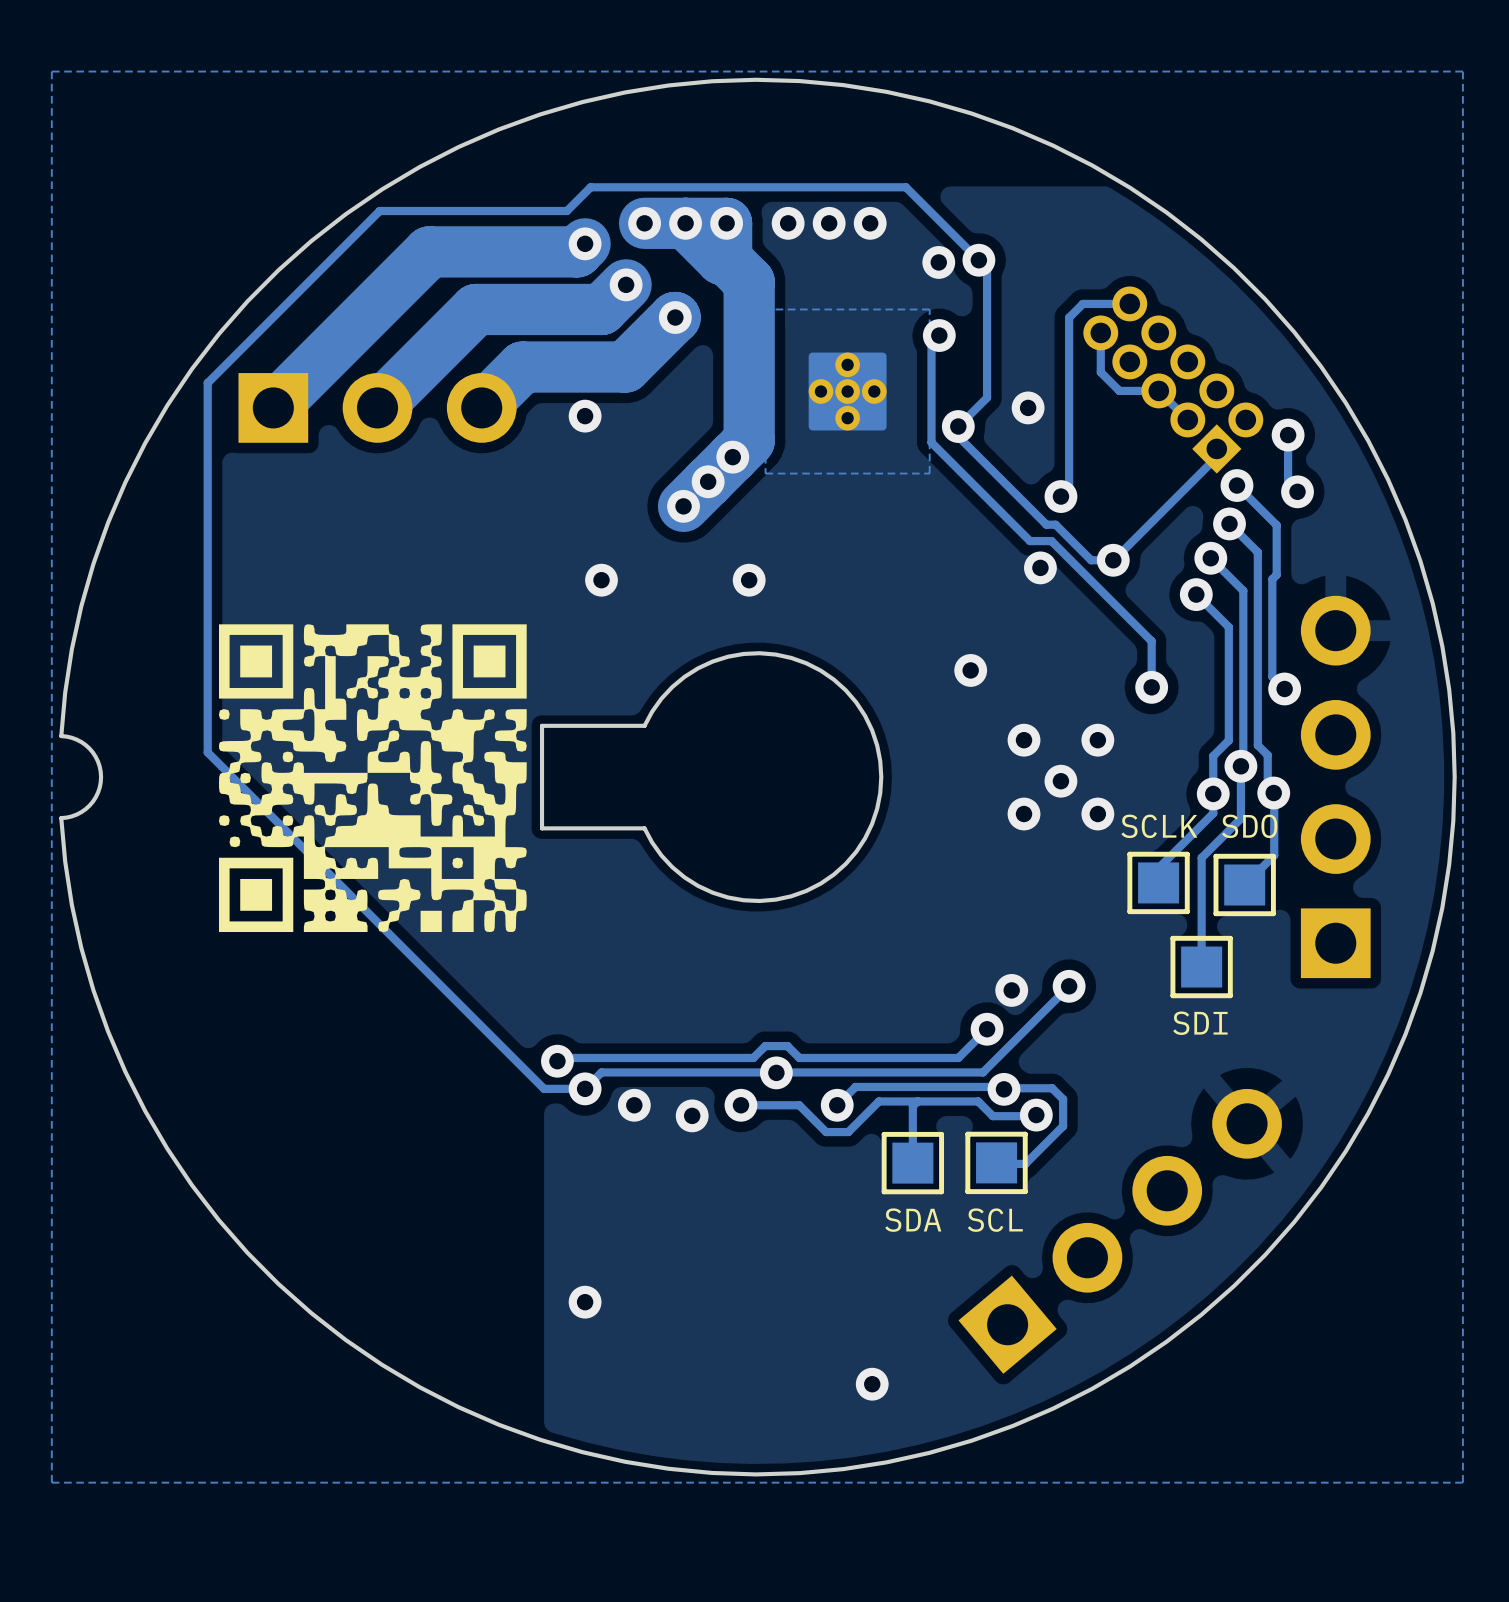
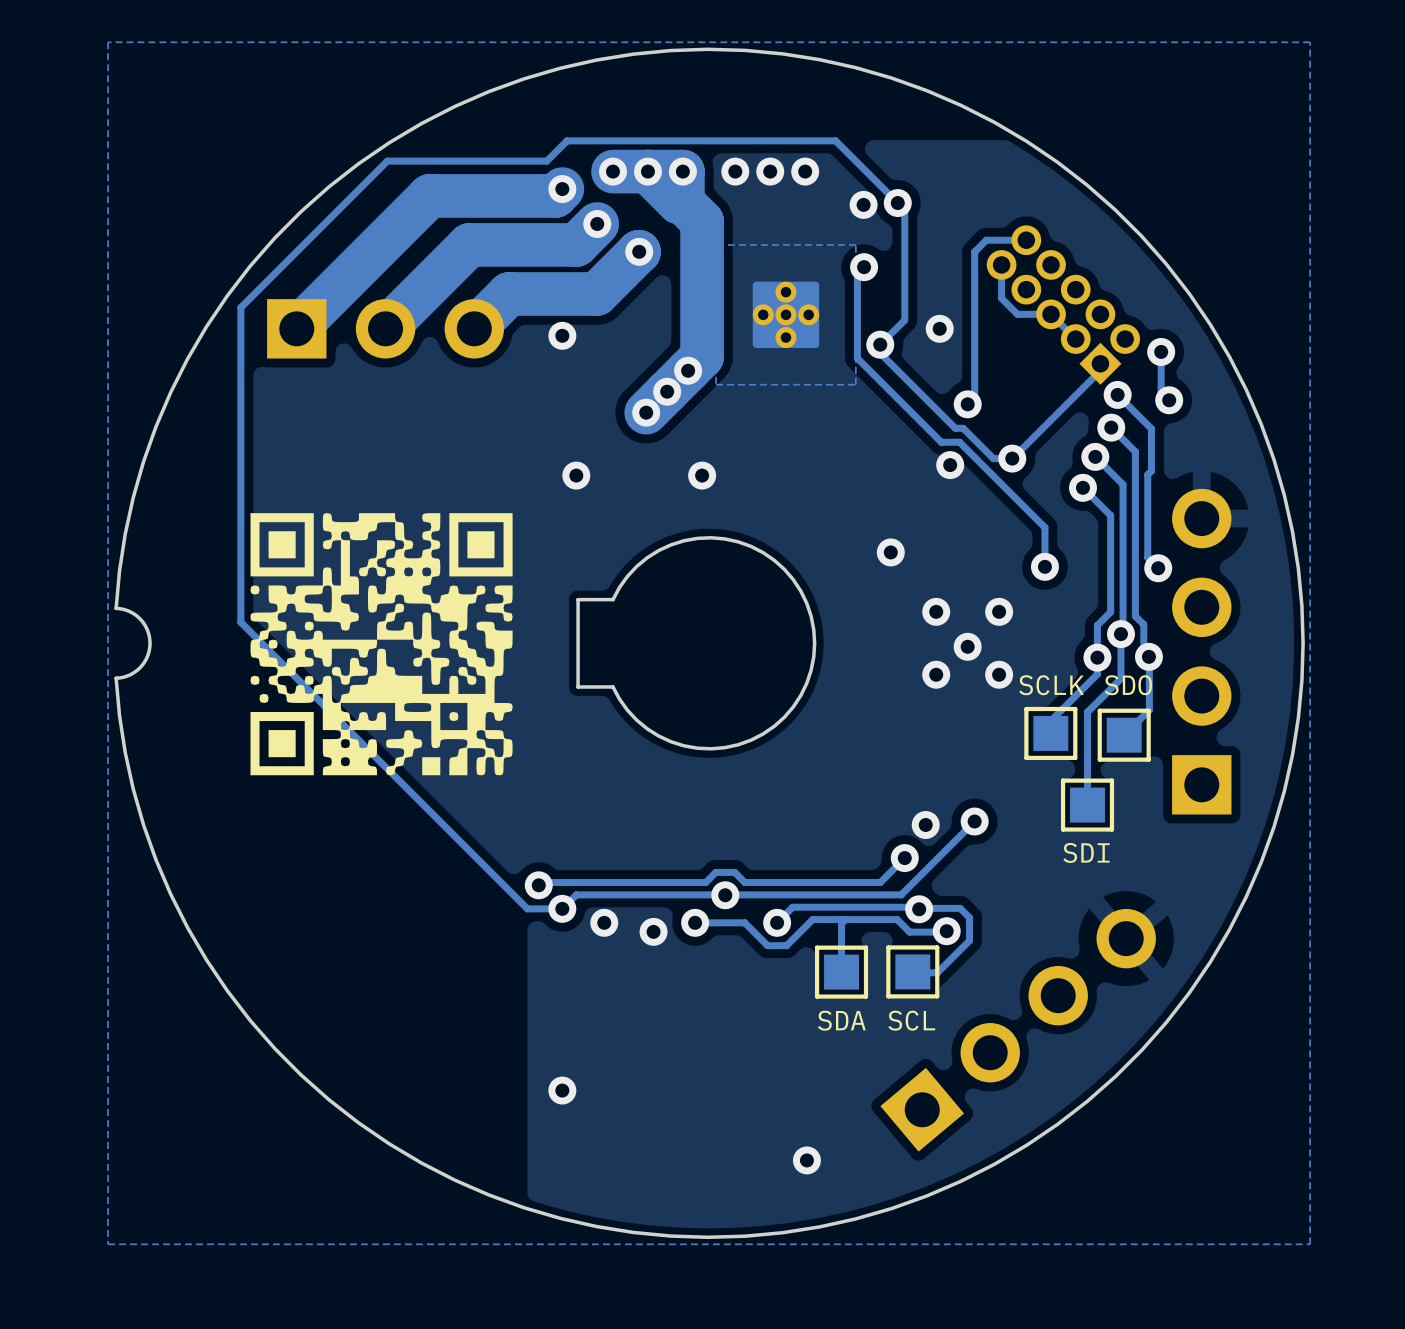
board edge: (603, 725) (542, 725) (542, 828) (603, 828) -> (578, 599) (578, 686)

